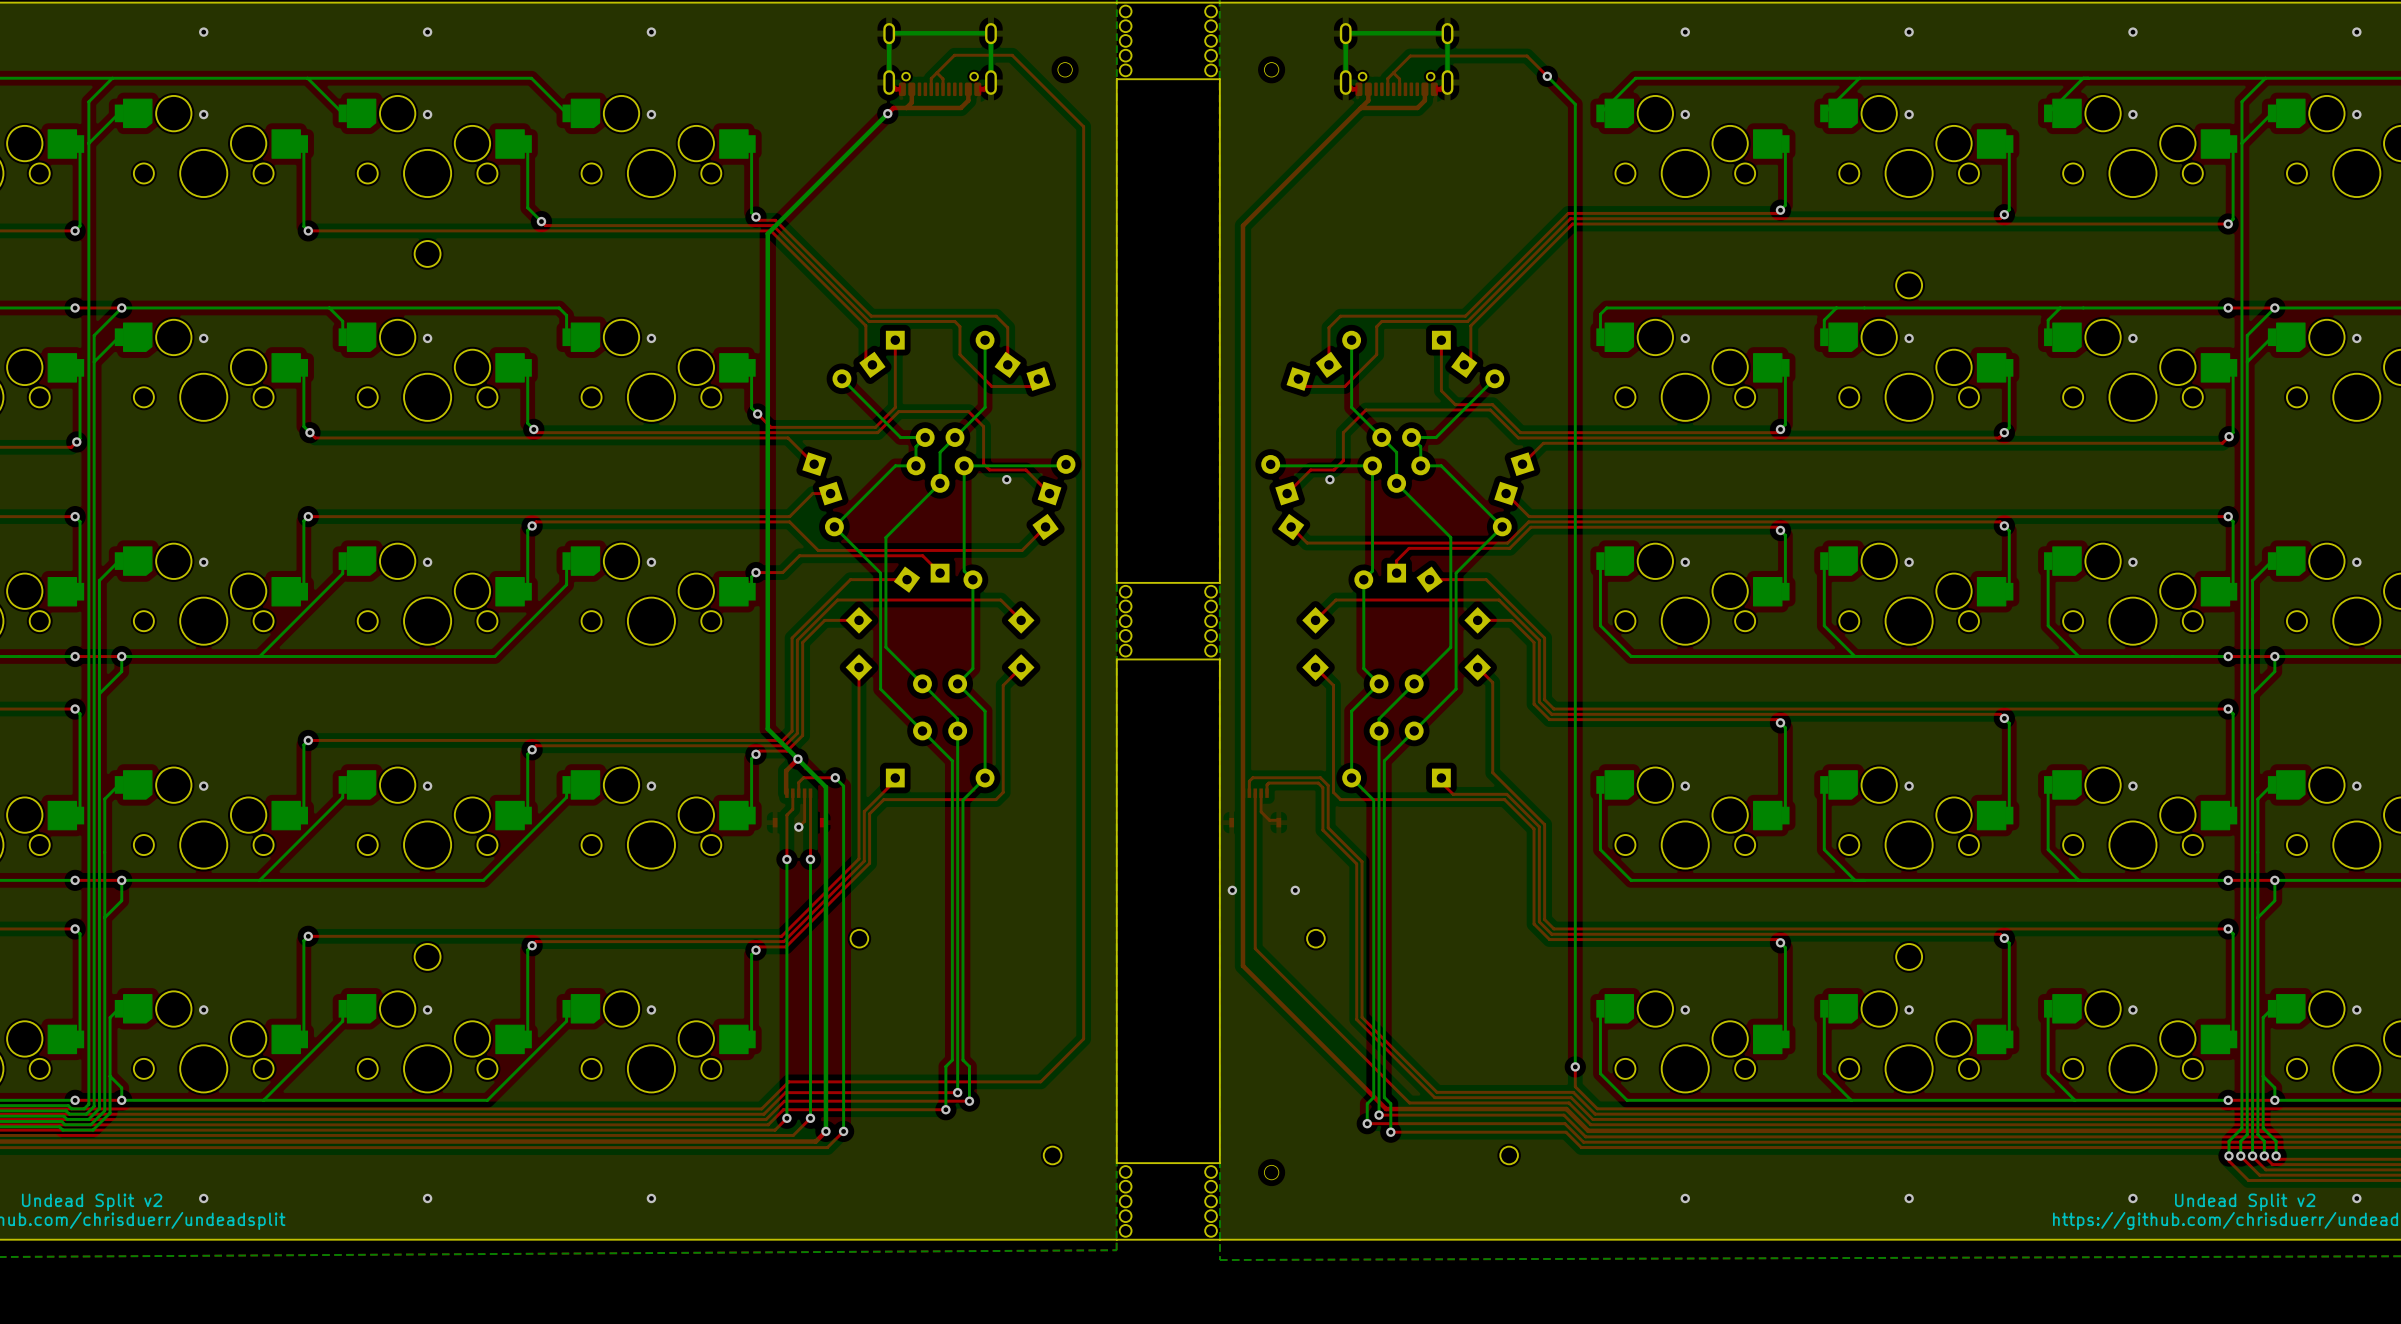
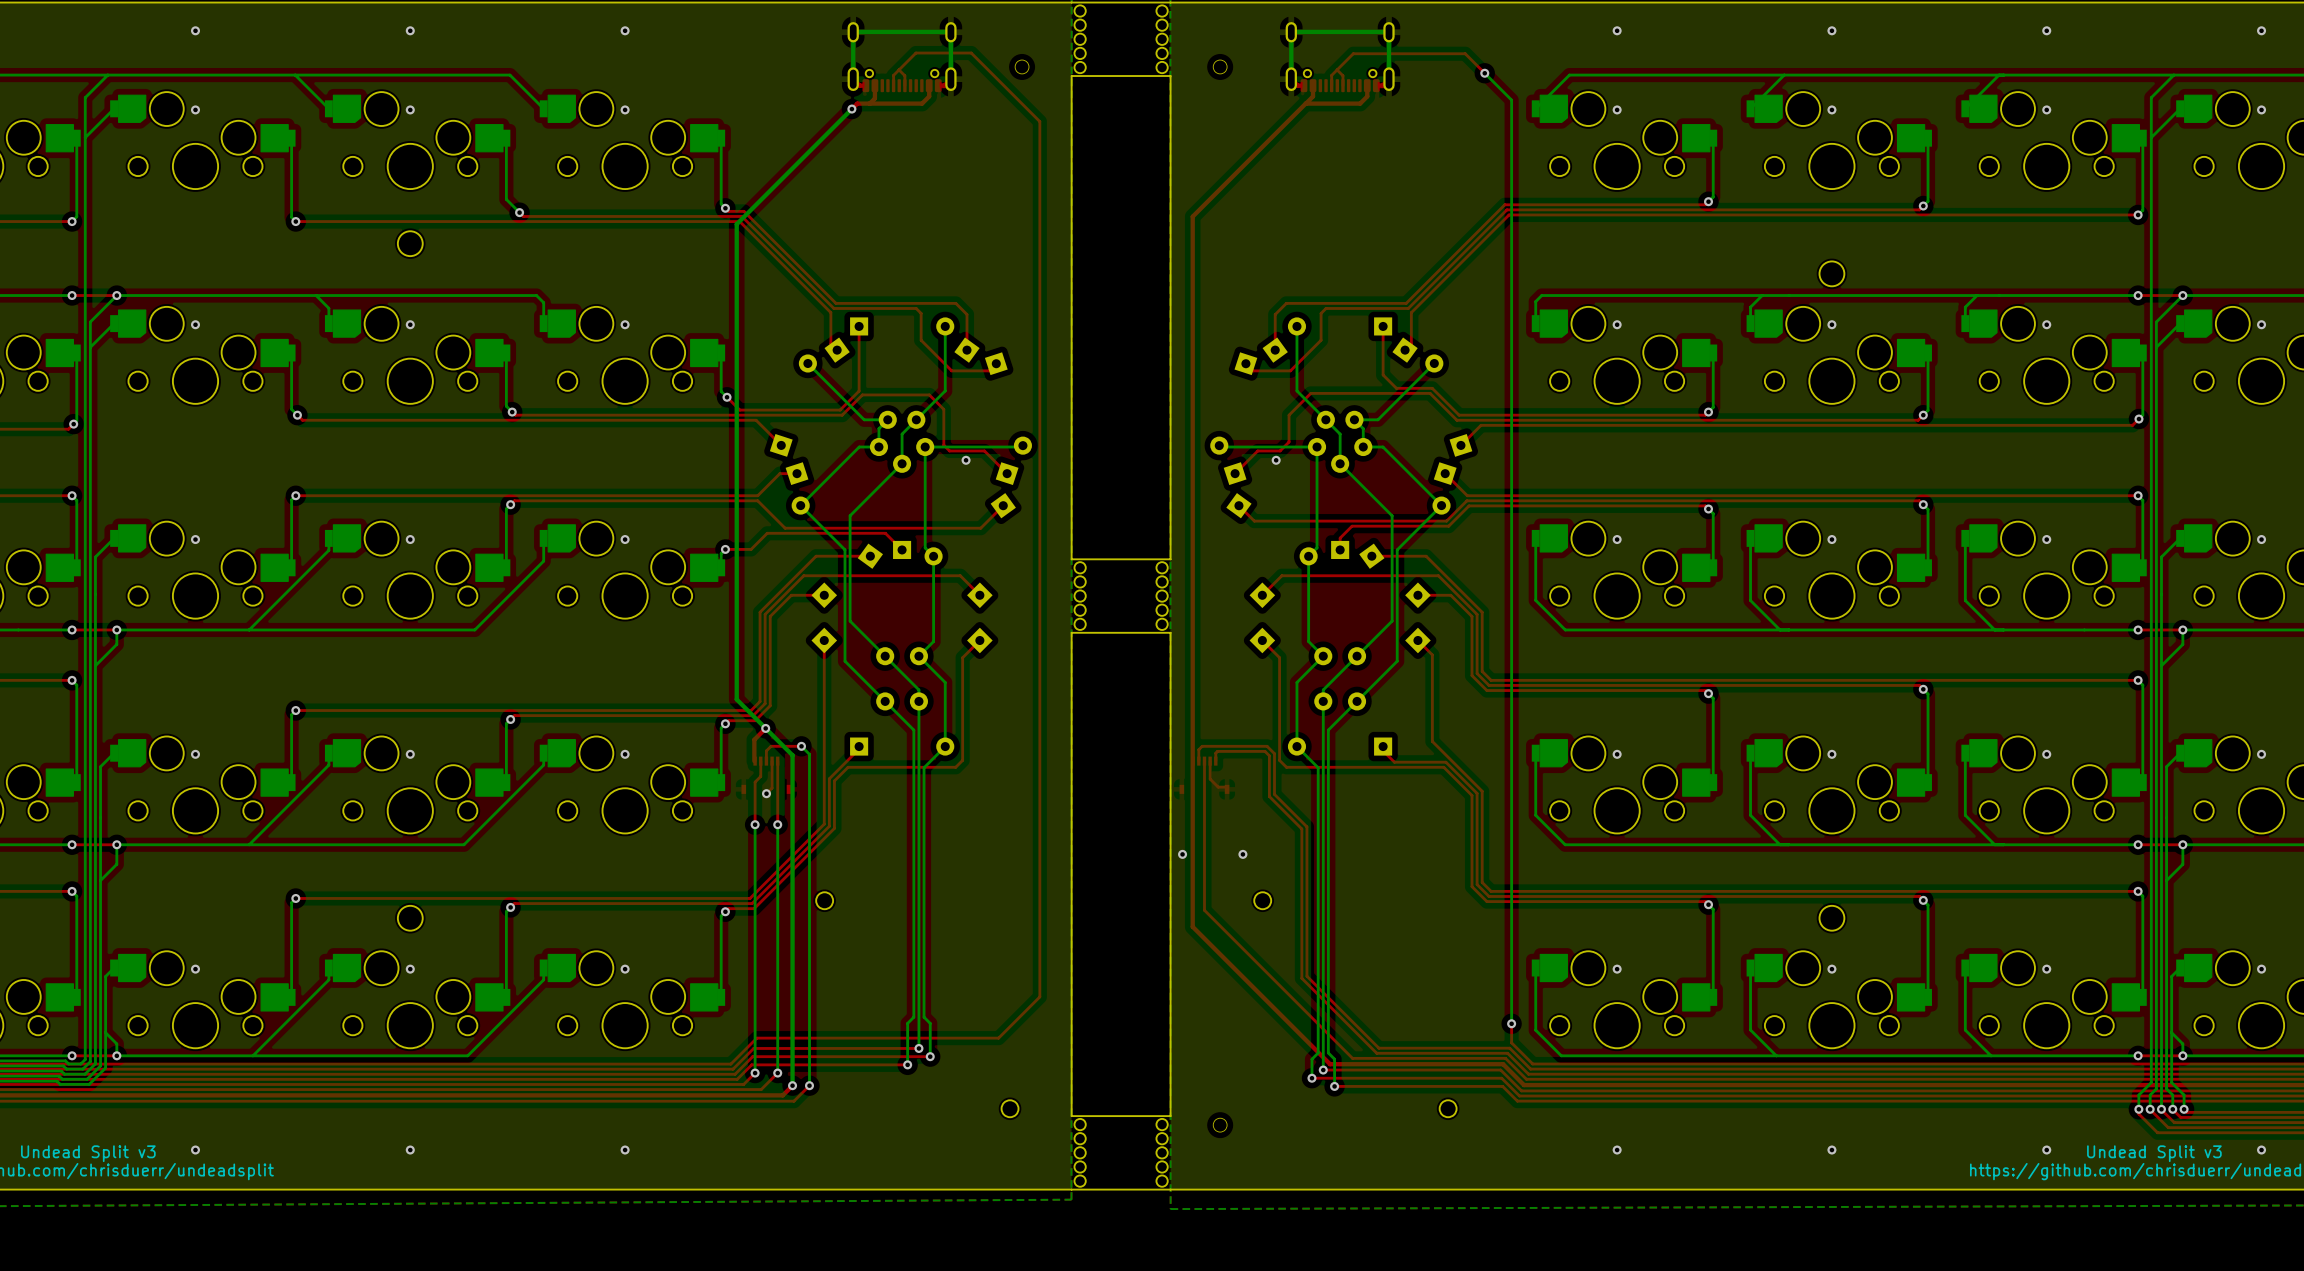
text: Undead Split v2 (92, 1202) -> Undead Split v3 (88, 1153)
text: Undead Split v2 (2245, 1202) -> Undead Split v3 (2154, 1153)

